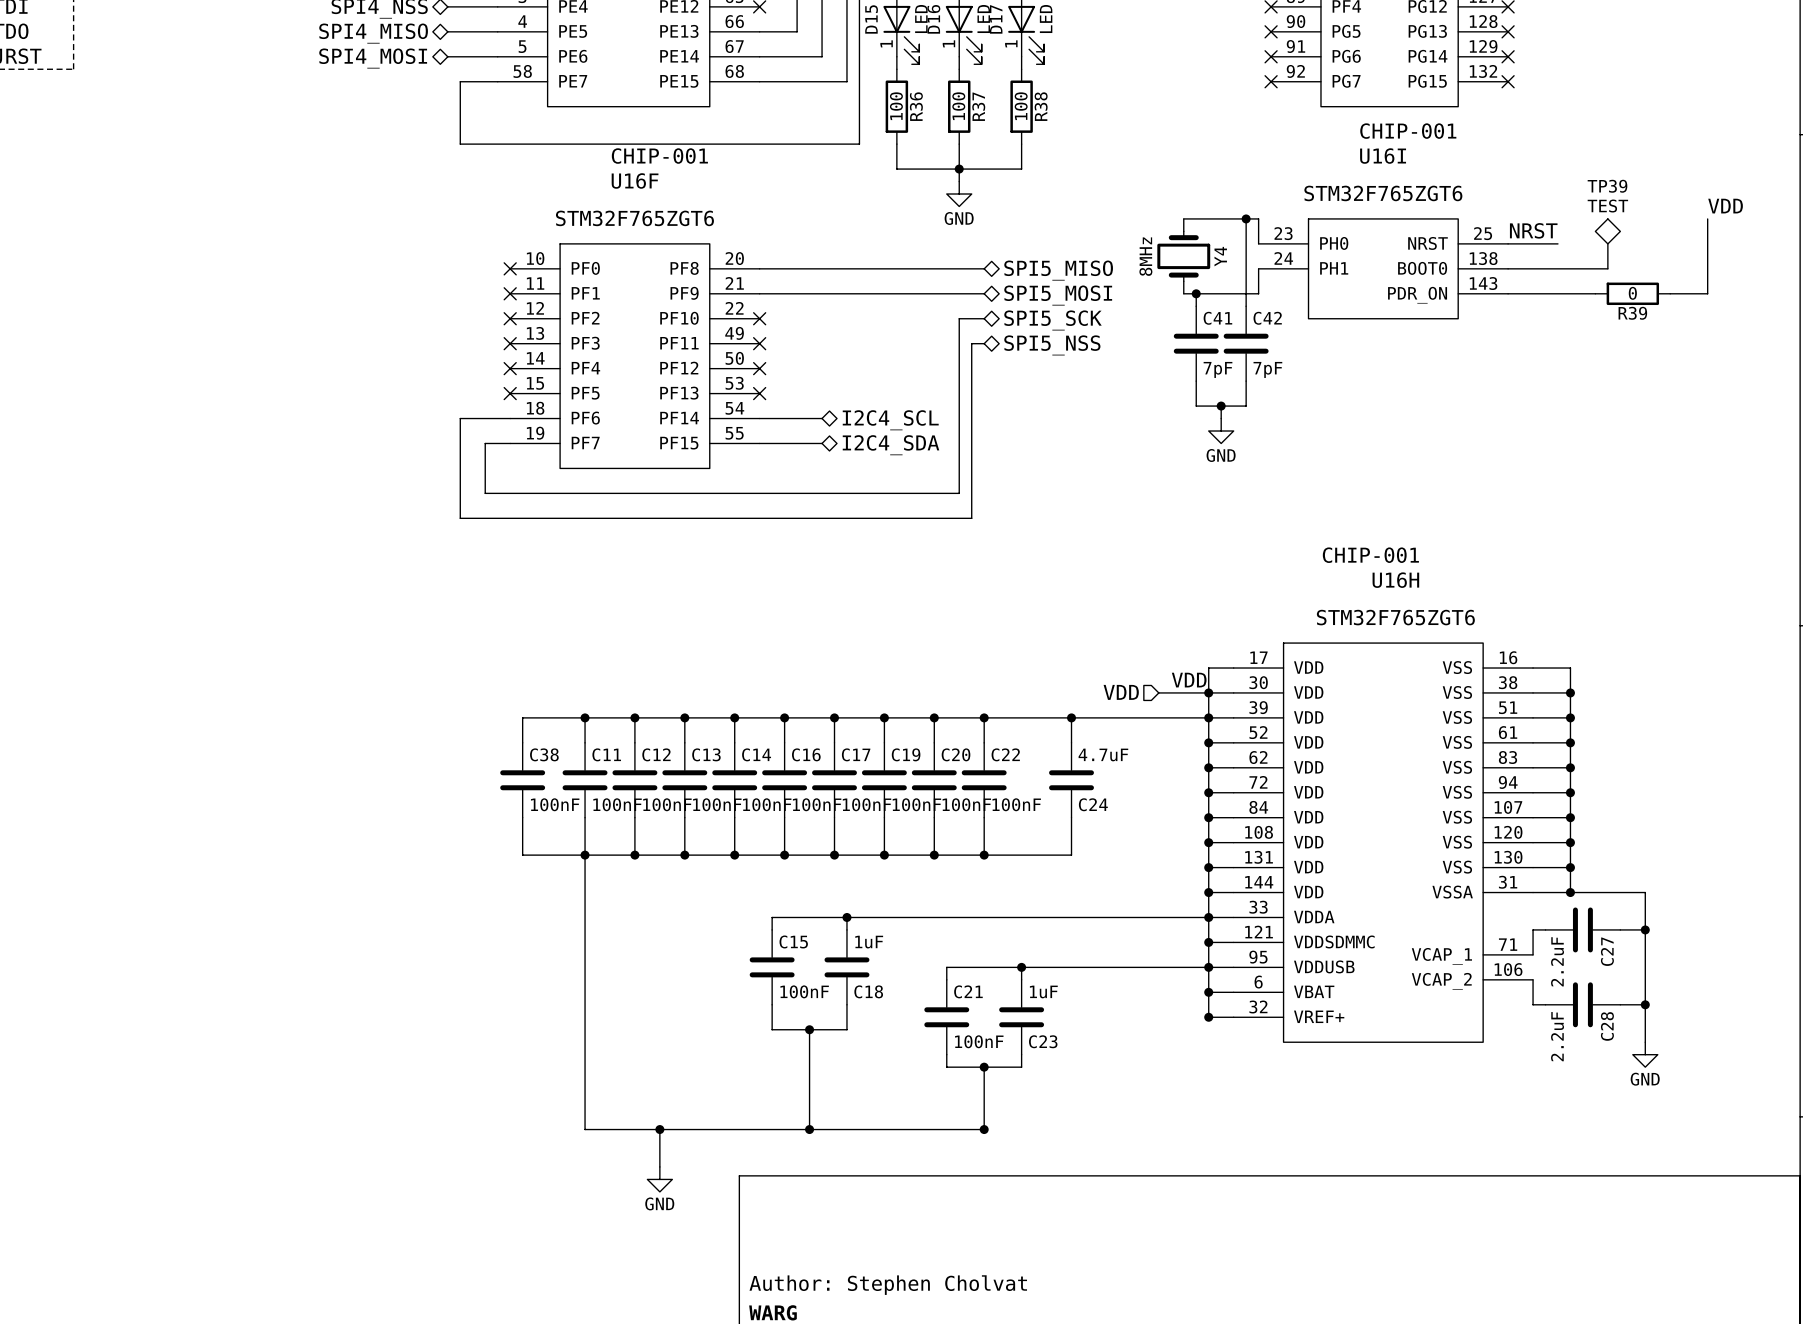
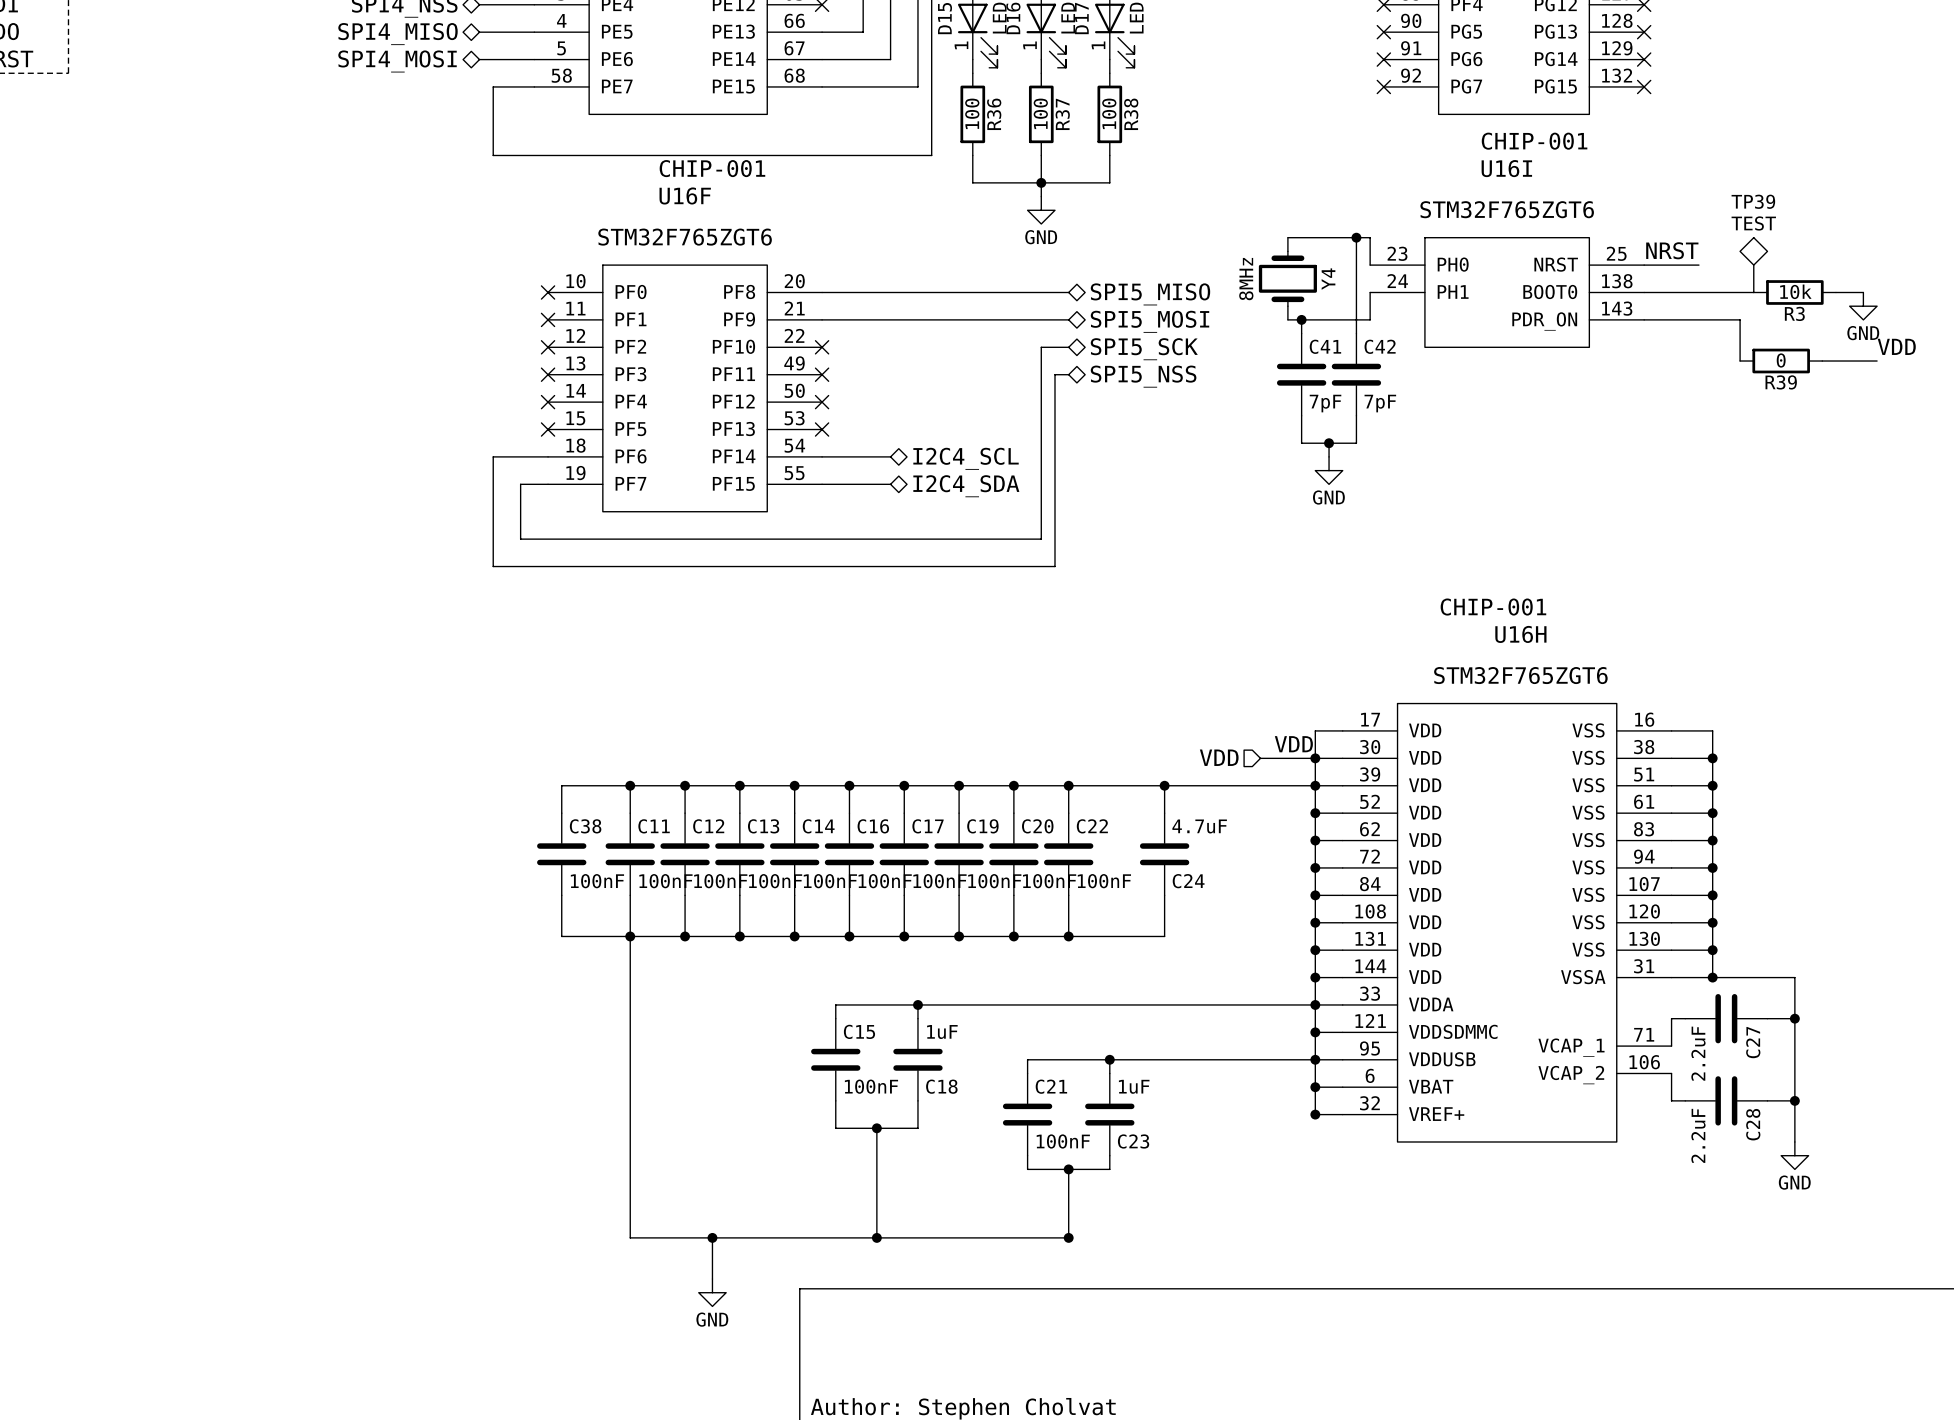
label position: VDD (1725, 206) -> VDD (1896, 346)
wire: (1707, 218) (1707, 293) (1670, 293) -> none
R3: none -> 10k (1794, 292)
wire: none -> (1835, 292) (1863, 292)
power symbol: none -> GND (1863, 306)
wire: none -> (1740, 319) (1740, 361)
R39 position: (1632, 293) -> (1781, 361)
wire: none -> (1822, 361) (1877, 361)

